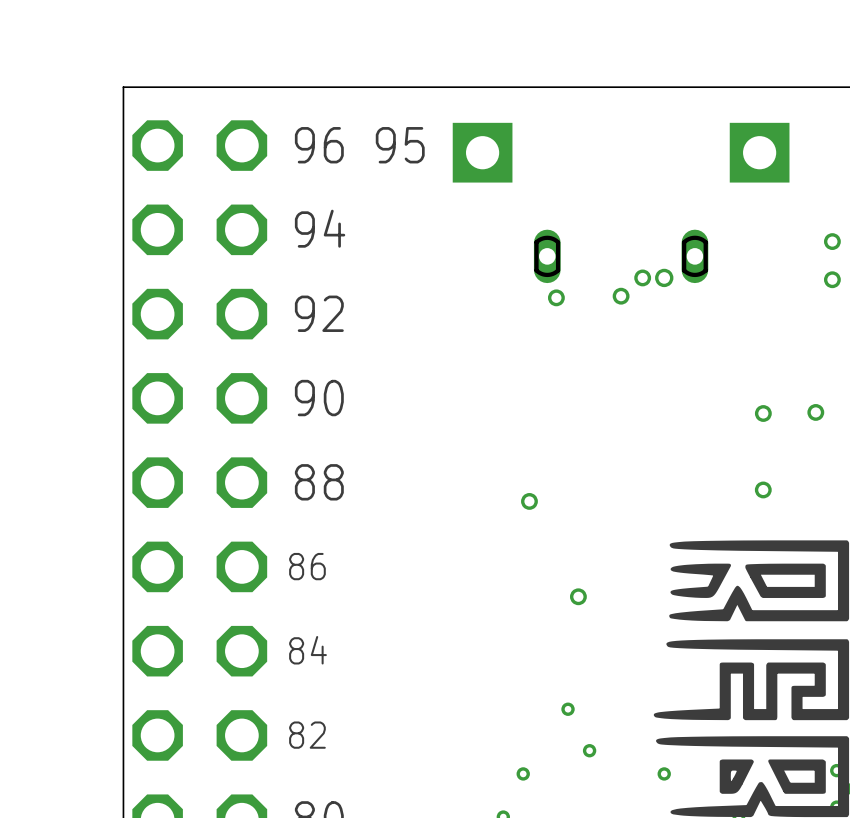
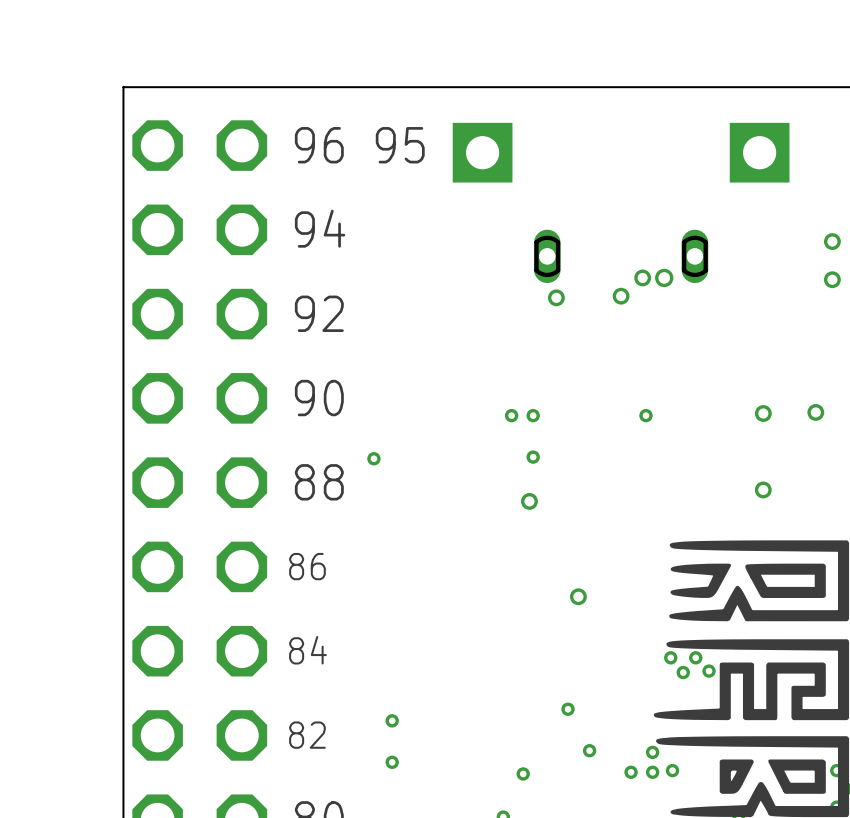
via: none -> (511, 415)
via: none -> (533, 415)
via: none -> (645, 415)
via: none -> (533, 457)
via: none -> (373, 458)
via: none -> (670, 657)
via: none -> (695, 657)
via: none -> (709, 671)
via: none -> (683, 672)
via: none -> (392, 720)
via: none -> (652, 752)
via: none -> (392, 762)
via: none -> (672, 770)
via: none -> (631, 772)
via: none -> (652, 772)
via: (664, 773) -> none

